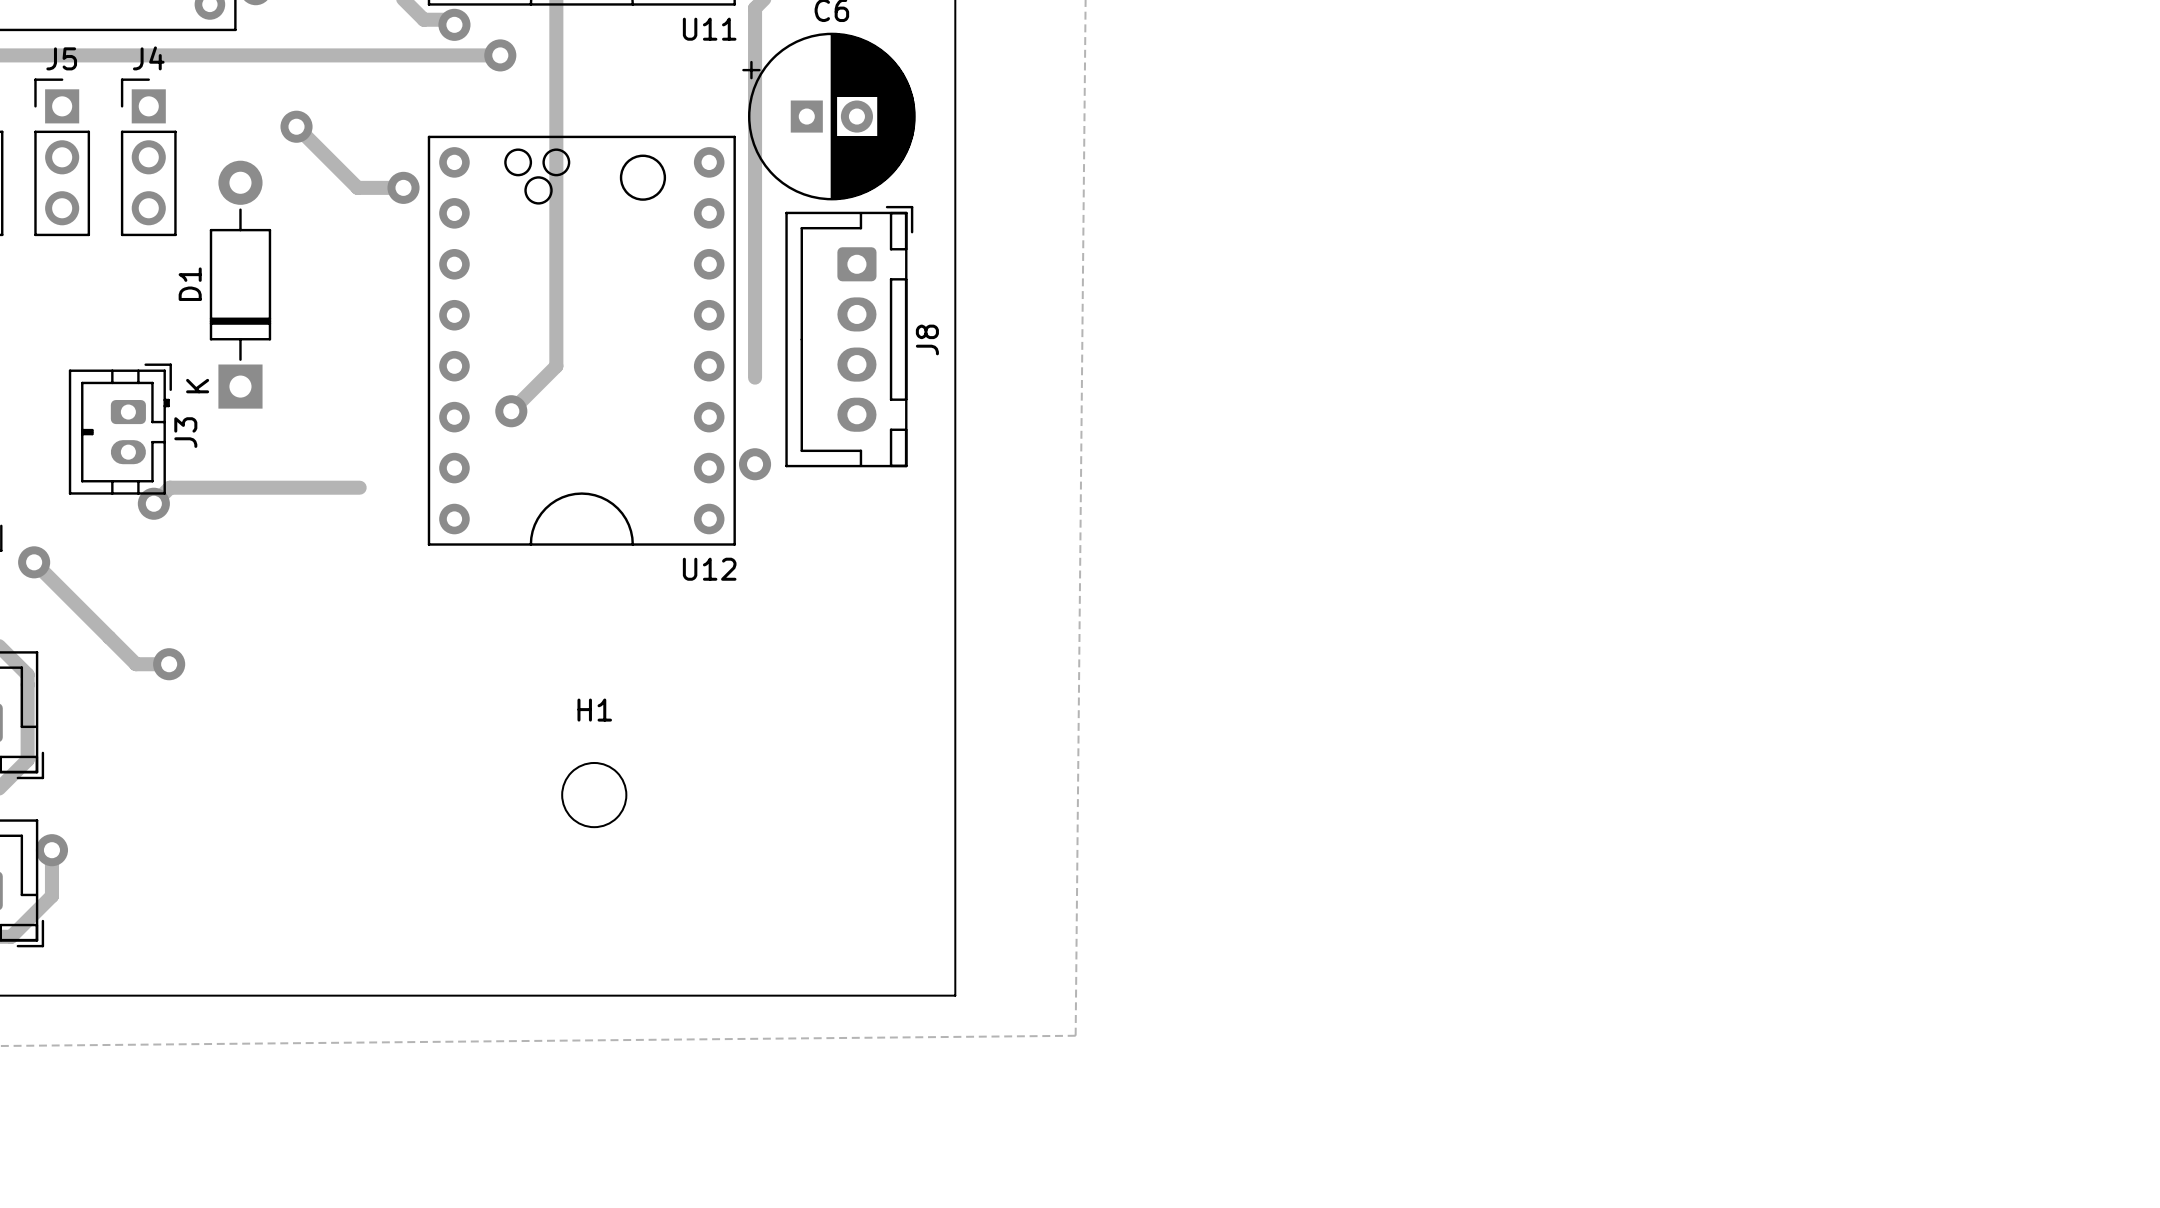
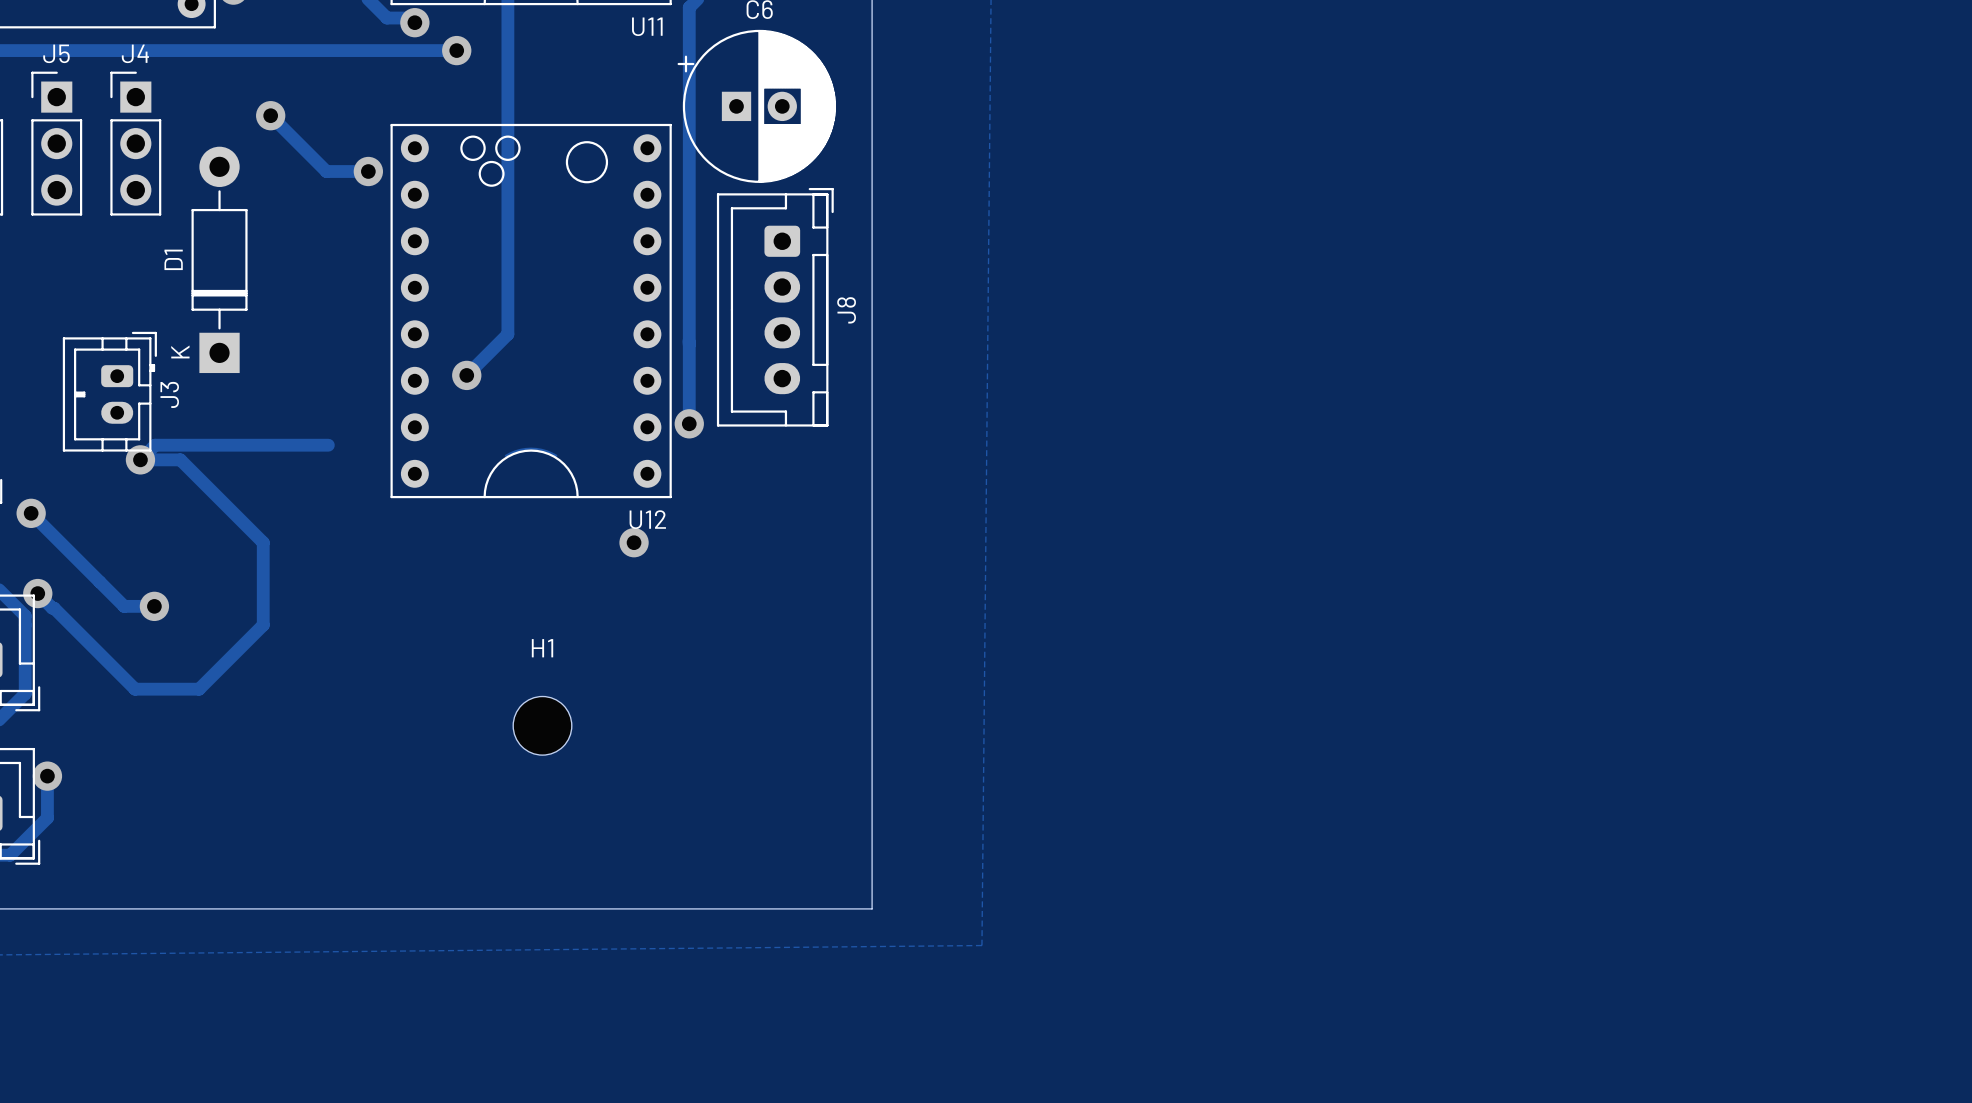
track: none -> (688, 341) (689, 423)
track: none -> (505, 455) (515, 451) (531, 448) (546, 451) (556, 455)
track: none -> (140, 459) (180, 459) (263, 542) (263, 625) (199, 689) (135, 689) (37, 593)
via: none -> (634, 542)
via: none -> (37, 593)

